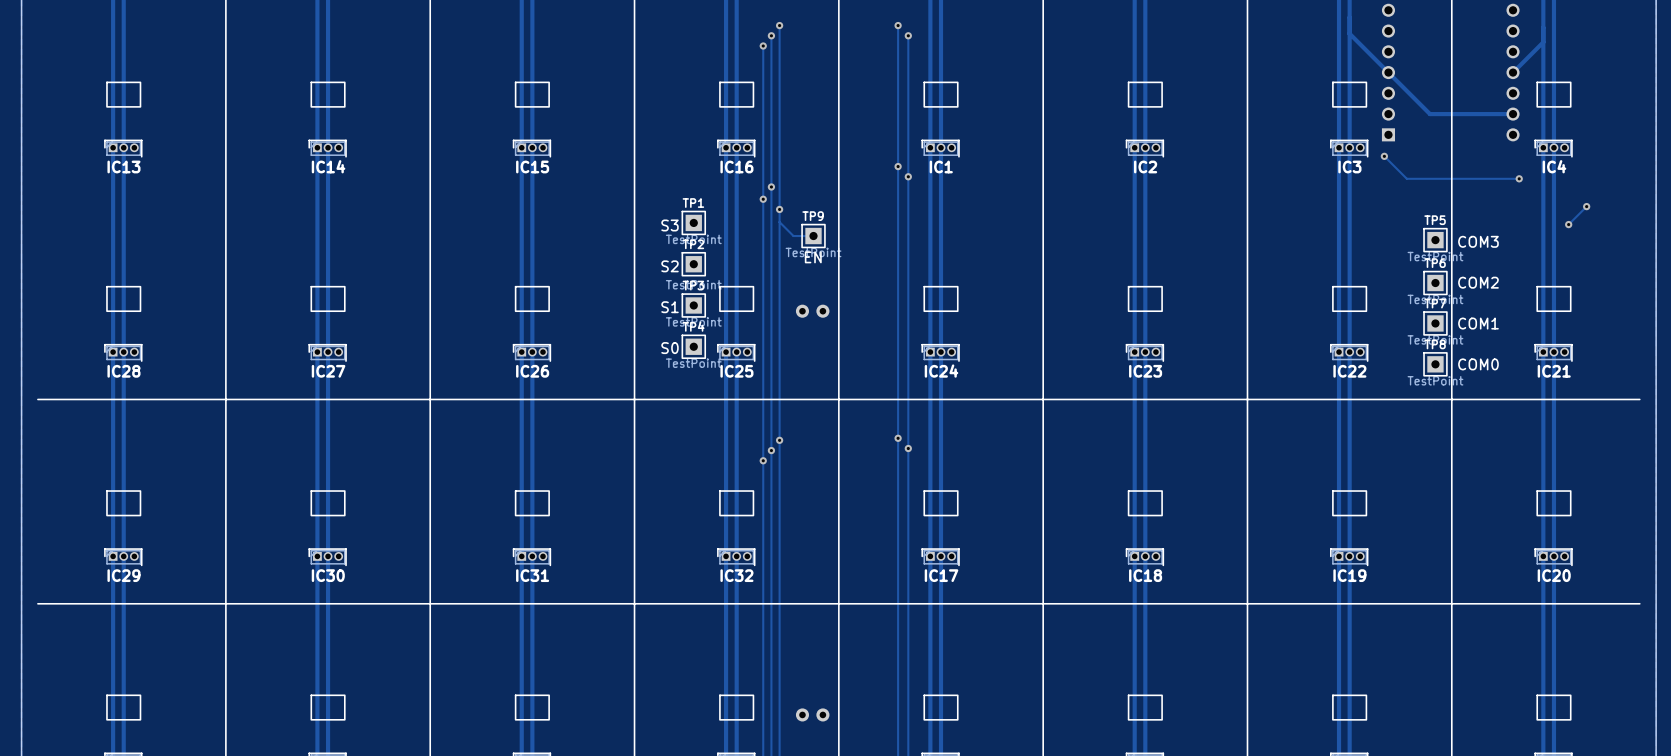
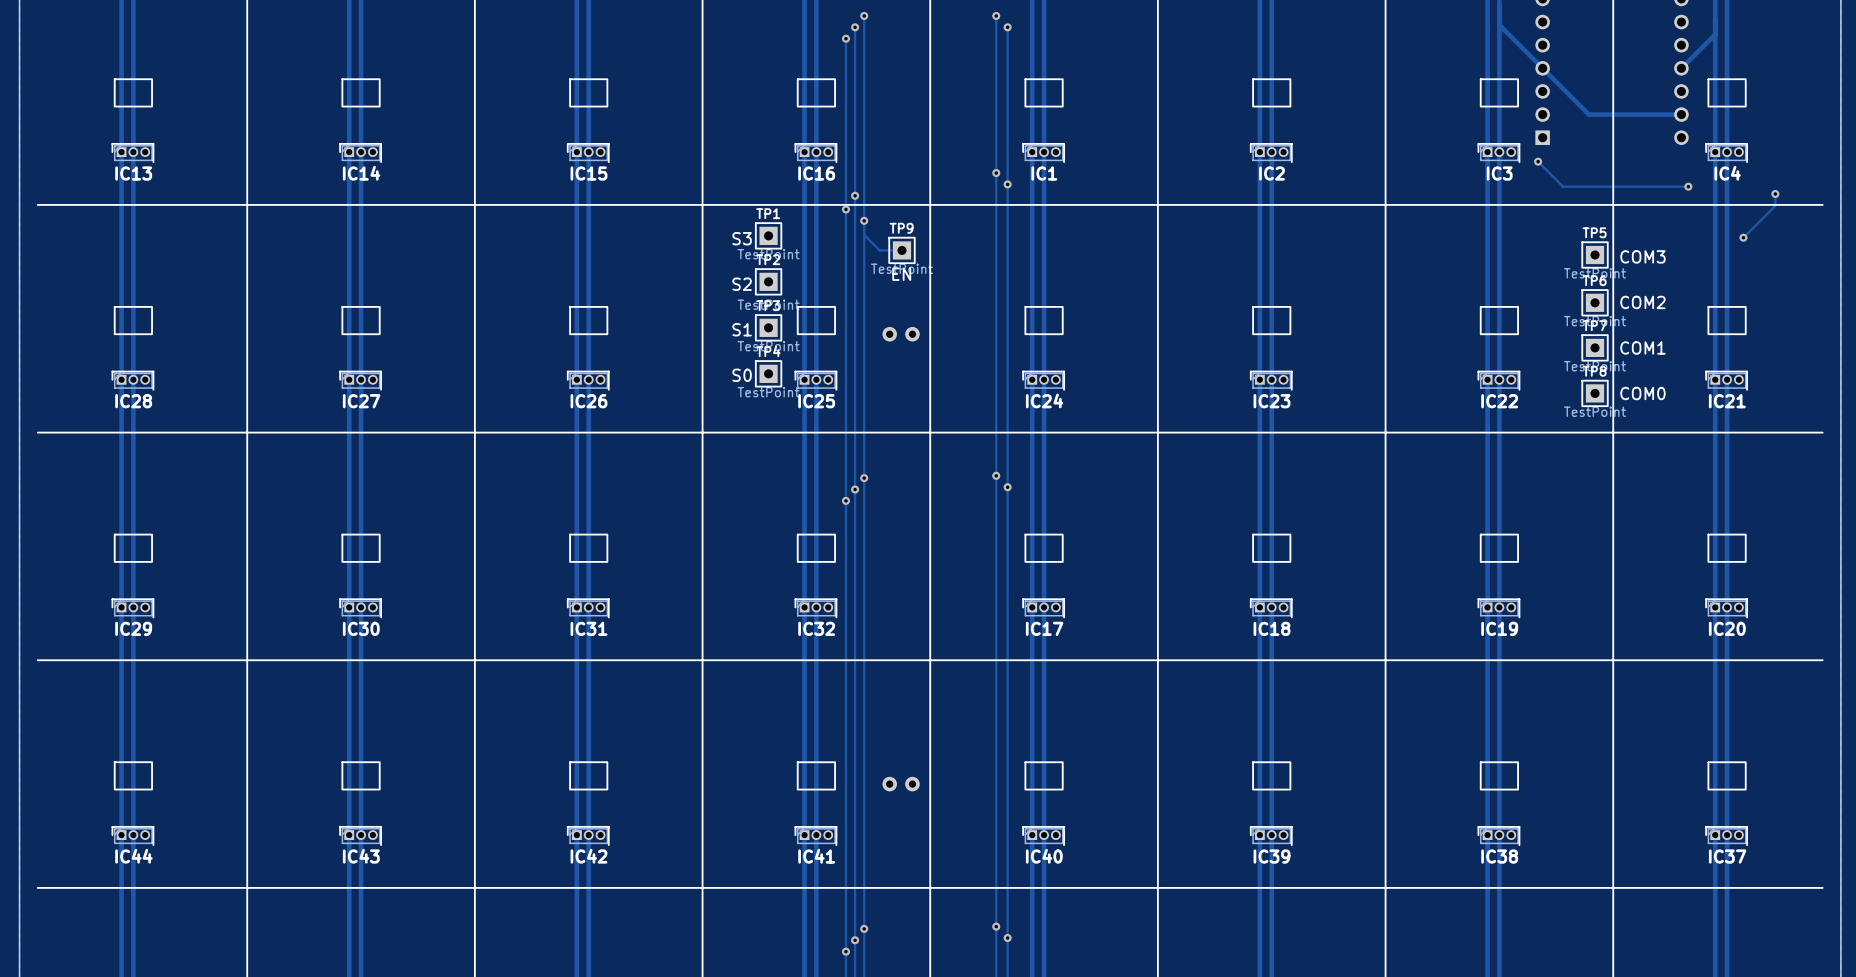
track: none -> (1775, 193) (1775, 205) (1763, 217)
line: none -> (37, 204) (1822, 204)
via position: (1586, 206) -> (1775, 193)

